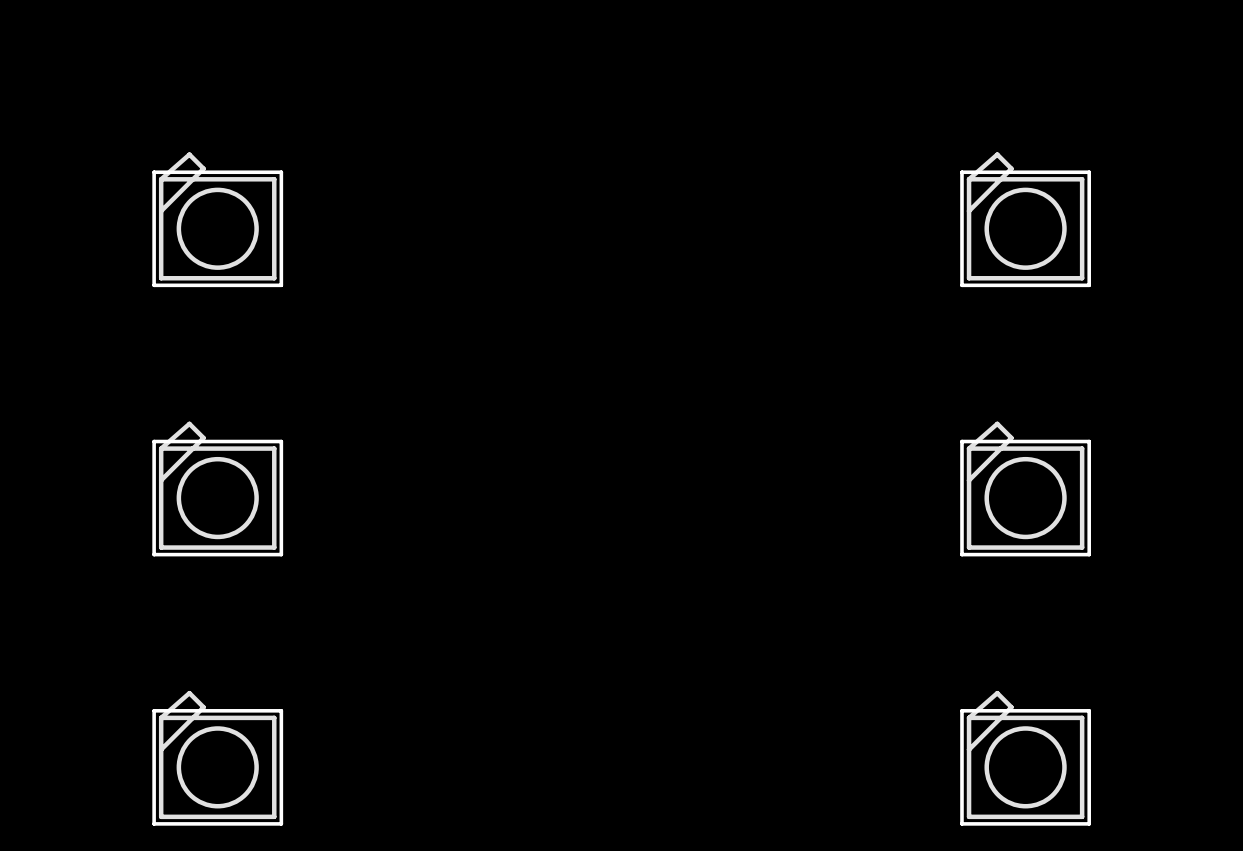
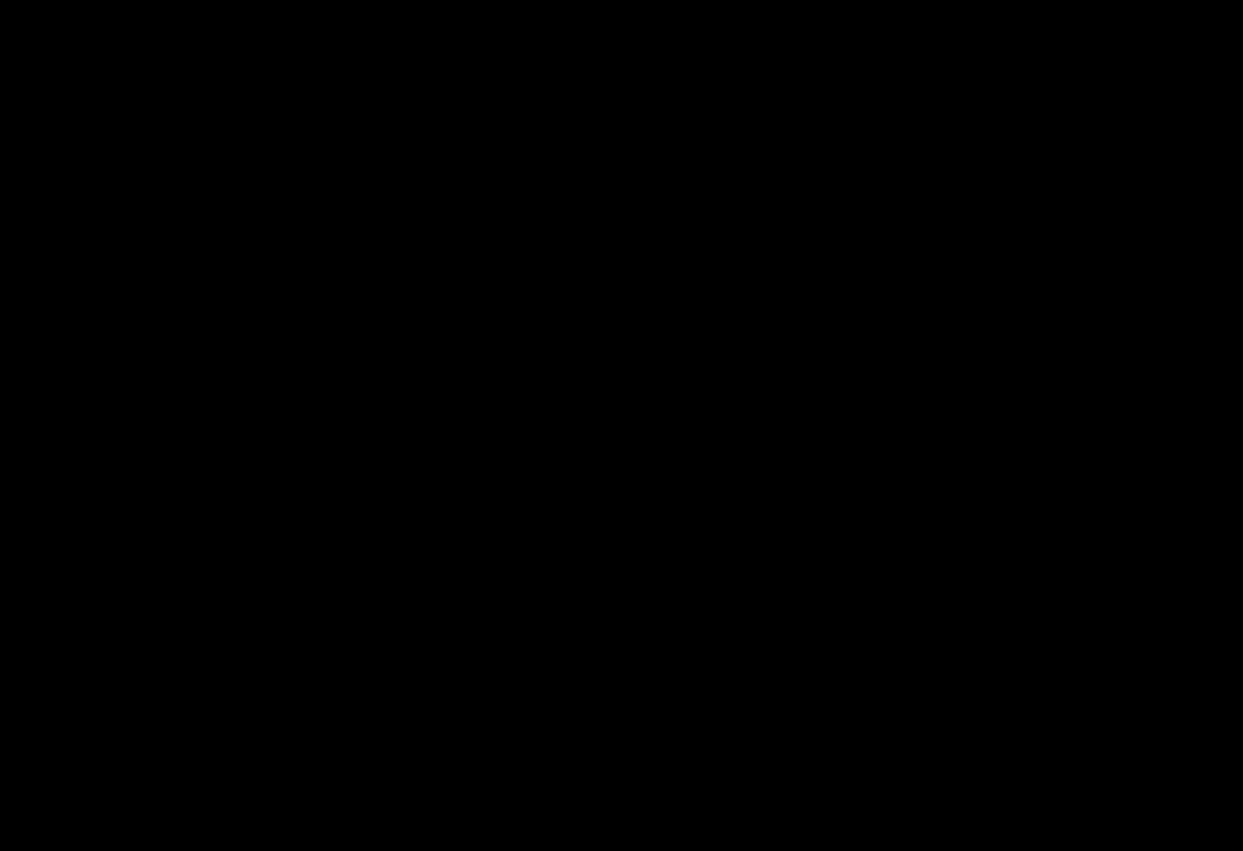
part: (217, 219) -> none
part: (1025, 219) -> none
part: (217, 489) -> none
part: (1025, 489) -> none
part: (217, 758) -> none
part: (1025, 758) -> none

